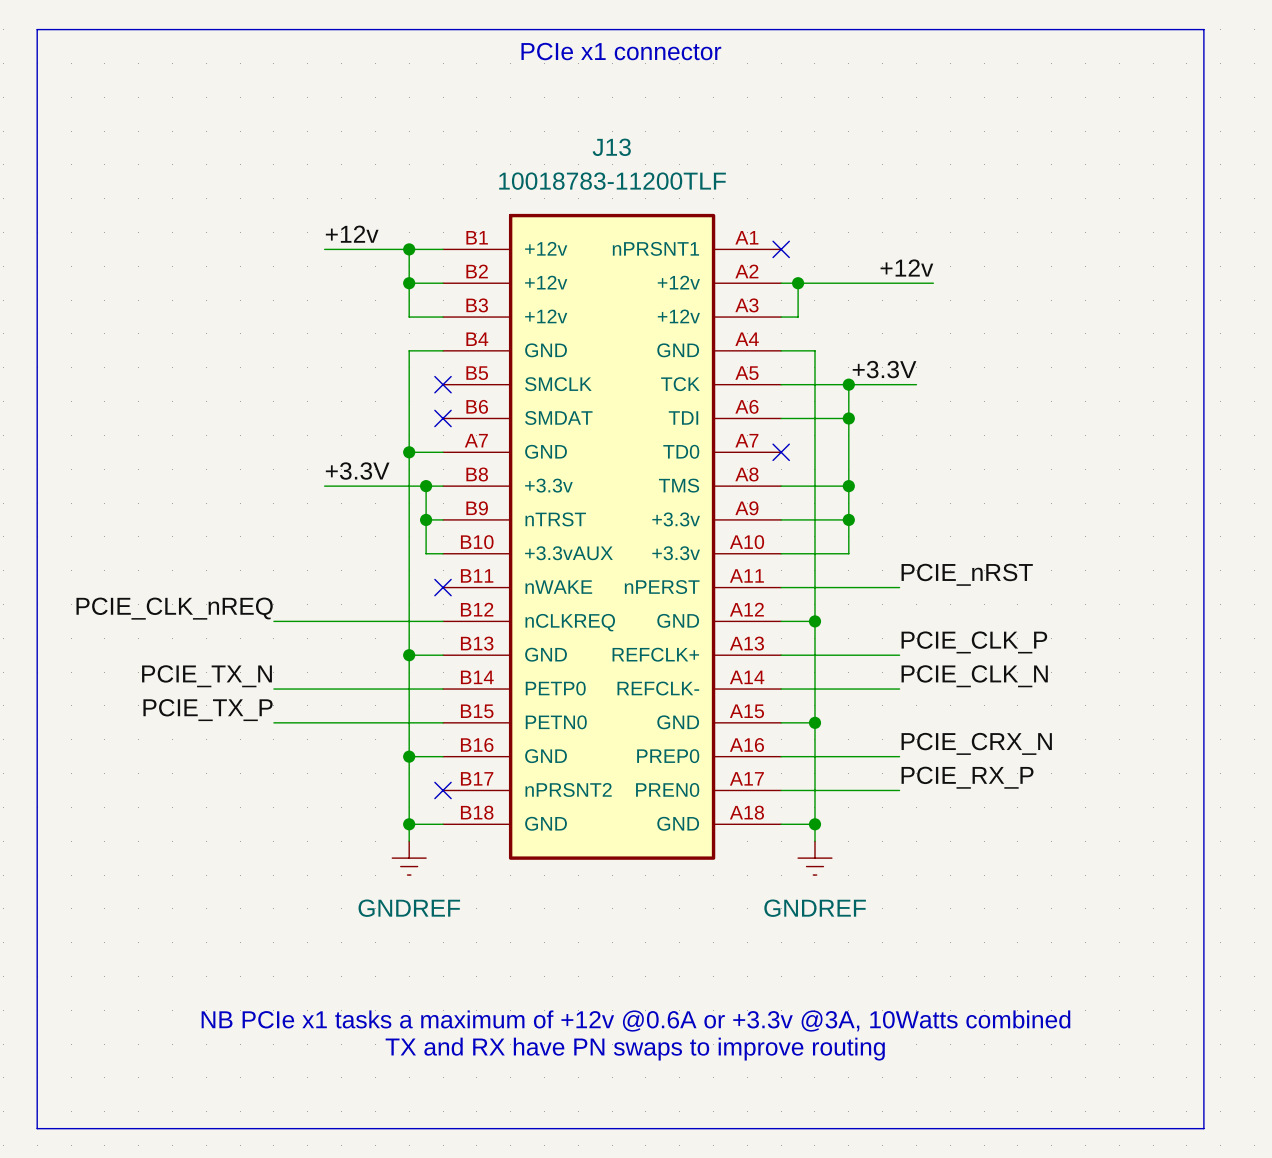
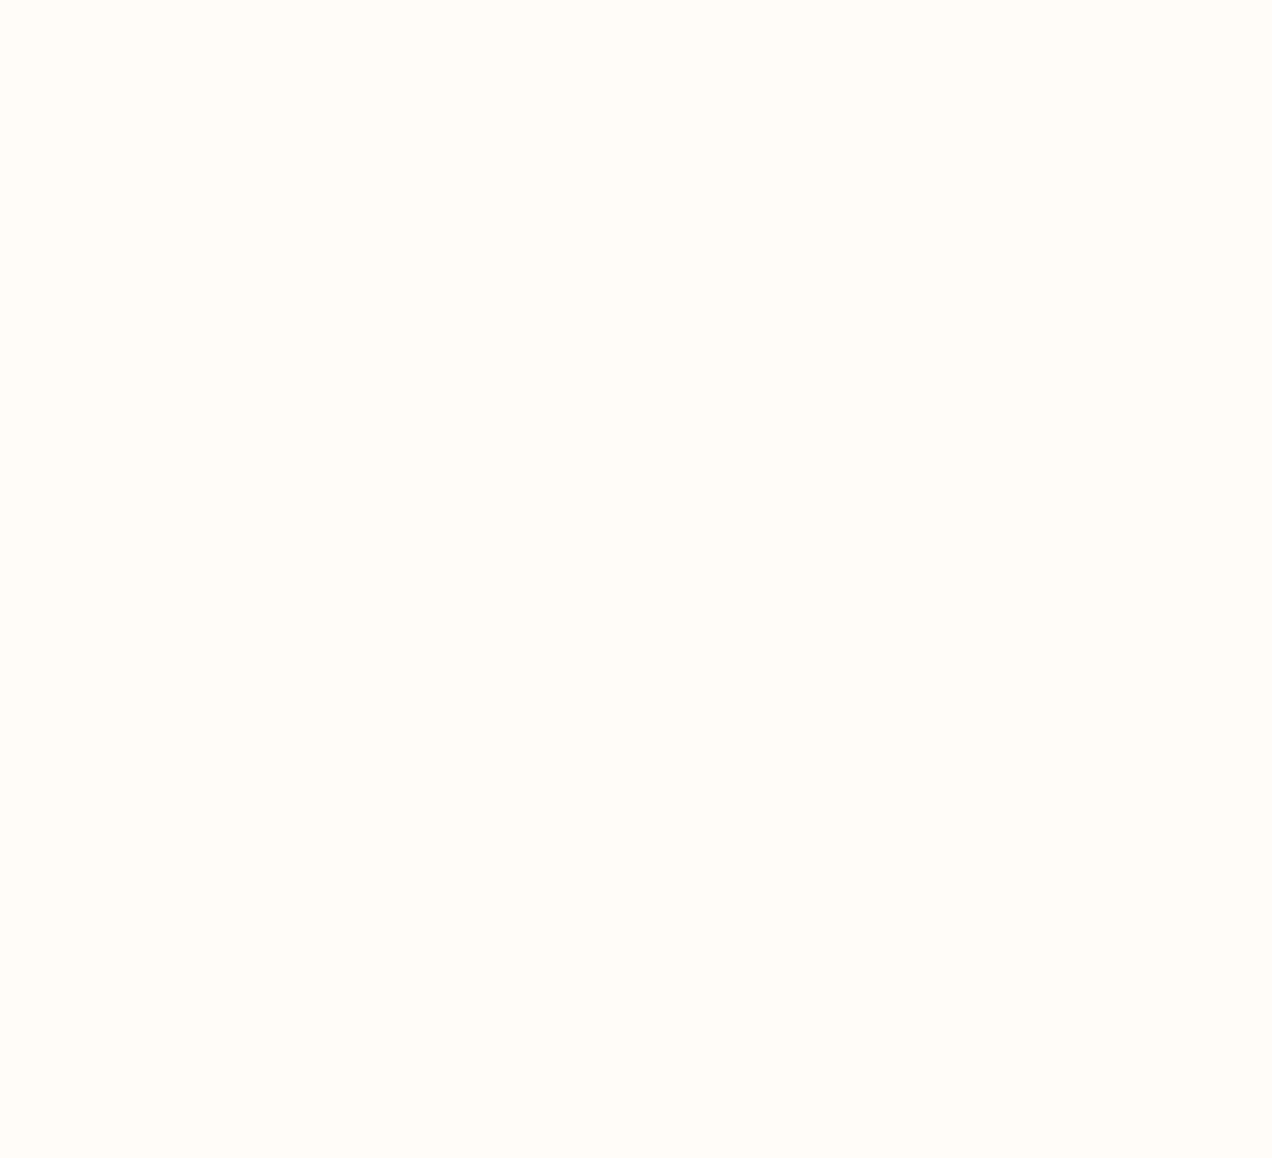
line: (37, 29) (1203, 29) (1203, 1128) (37, 1128) (37, 29) -> none
text: PCIe x1 connector (621, 51) -> none
label: +12v (352, 234) -> none
wire: (324, 249) (443, 249) -> none
wire: (409, 249) (409, 317) (443, 317) -> none
junction: (409, 249) -> none
no-connect mark: (781, 249) -> none
label: +12v (906, 268) -> none
wire: (409, 283) (443, 283) -> none
junction: (409, 283) -> none
wire: (781, 283) (933, 283) -> none
wire: (798, 283) (798, 317) (781, 317) -> none
junction: (798, 283) -> none
wire: (443, 350) (409, 350) (409, 841) -> none
wire: (781, 350) (814, 350) (814, 841) -> none
label: +3.3V (884, 369) -> none
no-connect mark: (443, 384) -> none
wire: (781, 384) (916, 384) -> none
wire: (848, 384) (848, 553) (781, 553) -> none
junction: (848, 384) -> none
no-connect mark: (443, 418) -> none
wire: (781, 418) (848, 418) -> none
junction: (848, 418) -> none
wire: (409, 452) (443, 452) -> none
junction: (409, 452) -> none
no-connect mark: (781, 452) -> none
label: +3.3V (357, 471) -> none
wire: (324, 486) (443, 486) -> none
wire: (426, 486) (426, 553) (443, 553) -> none
junction: (426, 486) -> none
wire: (781, 486) (848, 486) -> none
junction: (848, 486) -> none
wire: (426, 519) (443, 519) -> none
junction: (426, 519) -> none
wire: (781, 519) (848, 519) -> none
junction: (848, 519) -> none
J13: 10018783-11200TLF (612, 536) -> none
label: PCIE_nRST (967, 574) -> none
no-connect mark: (443, 587) -> none
wire: (781, 587) (899, 587) -> none
label: PCIE_CLK_nREQ (174, 608) -> none
wire: (273, 621) (443, 621) -> none
wire: (781, 621) (814, 621) -> none
junction: (814, 621) -> none
label: PCIE_CLK_P (974, 642) -> none
wire: (409, 655) (443, 655) -> none
junction: (409, 655) -> none
wire: (781, 655) (899, 655) -> none
label: PCIE_TX_N (206, 676) -> none
label: PCIE_CLK_N (974, 676) -> none
wire: (273, 689) (443, 689) -> none
wire: (781, 689) (899, 689) -> none
label: PCIE_TX_P (208, 710) -> none
wire: (273, 722) (443, 722) -> none
wire: (781, 722) (814, 722) -> none
junction: (814, 722) -> none
label: PCIE_CRX_N (976, 743) -> none
wire: (409, 756) (443, 756) -> none
junction: (409, 756) -> none
wire: (781, 756) (899, 756) -> none
label: PCIE_RX_P (967, 777) -> none
no-connect mark: (443, 790) -> none
wire: (781, 790) (899, 790) -> none
wire: (409, 824) (443, 824) -> none
junction: (409, 824) -> none
wire: (781, 824) (814, 824) -> none
junction: (814, 824) -> none
power symbol: GNDREF (409, 858) -> none
power symbol: GNDREF (814, 858) -> none
text: NB PCIe x1 tasks a maximum of +12v @0.6A or +3.3v @3A, 10Watts combined (635, 1021) -> none
text: TX and RX have PN swaps to improve routing (635, 1049) -> none

